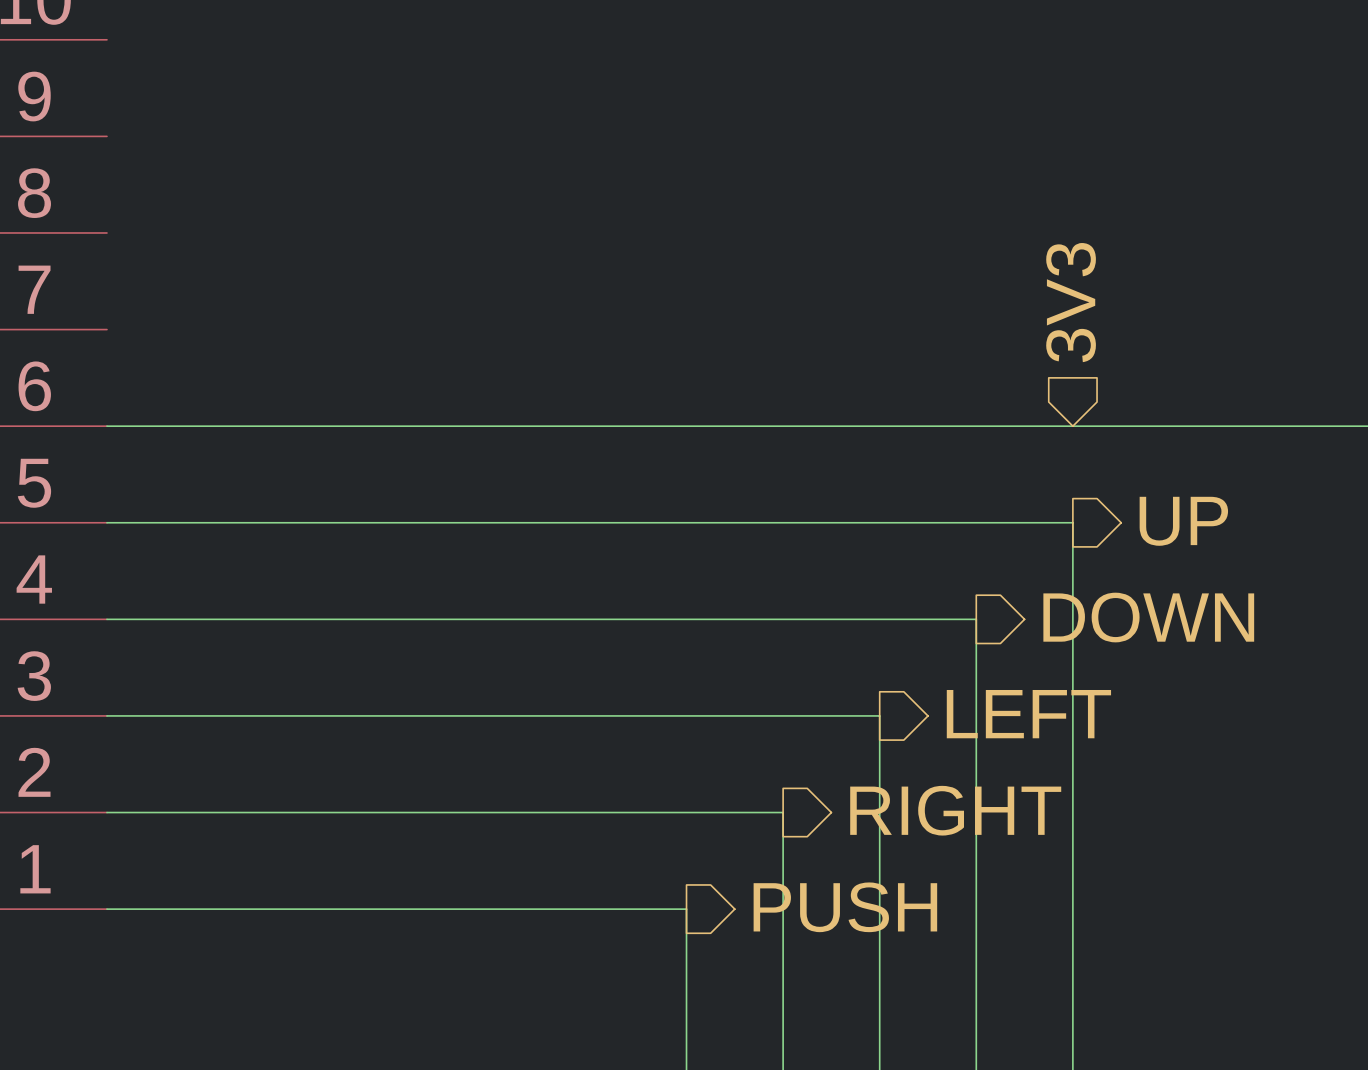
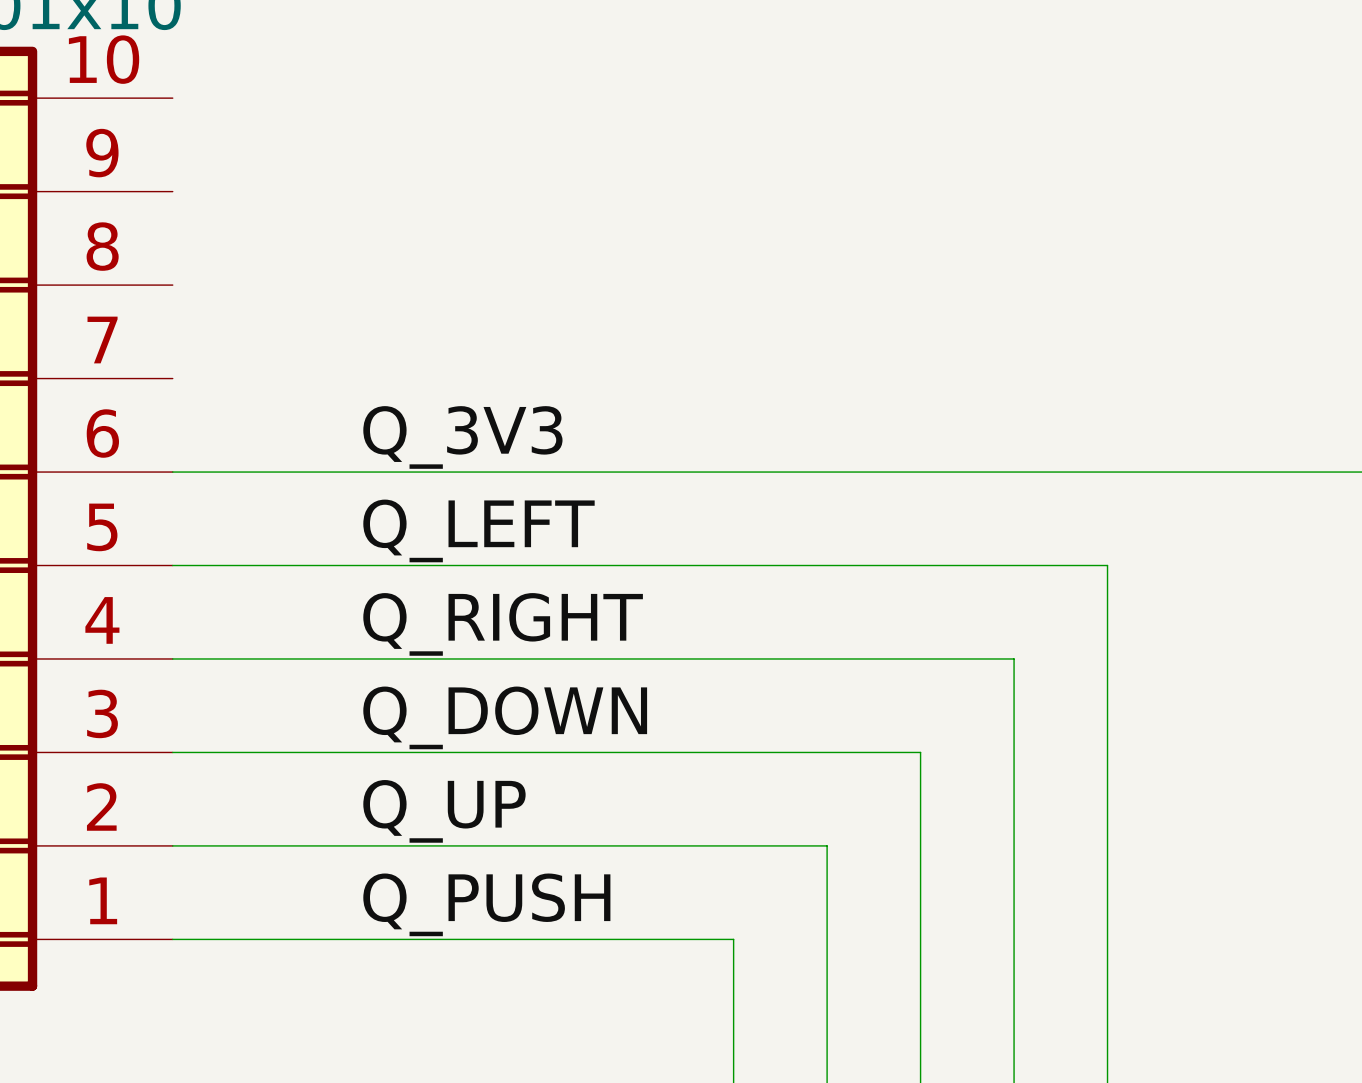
hierarchical label: 3V3 (1071, 302) -> none
label: none -> Q_3V3 (462, 437)
label: none -> Q_LEFT (478, 530)
hierarchical label: UP (1183, 521) -> none
label: none -> Q_RIGHT (503, 624)
hierarchical label: DOWN (1148, 617) -> none
label: none -> Q_DOWN (505, 717)
hierarchical label: LEFT (1028, 714) -> none
label: none -> Q_UP (444, 811)
hierarchical label: RIGHT (955, 810) -> none
label: none -> Q_PUSH (486, 904)
hierarchical label: PUSH (845, 907) -> none

